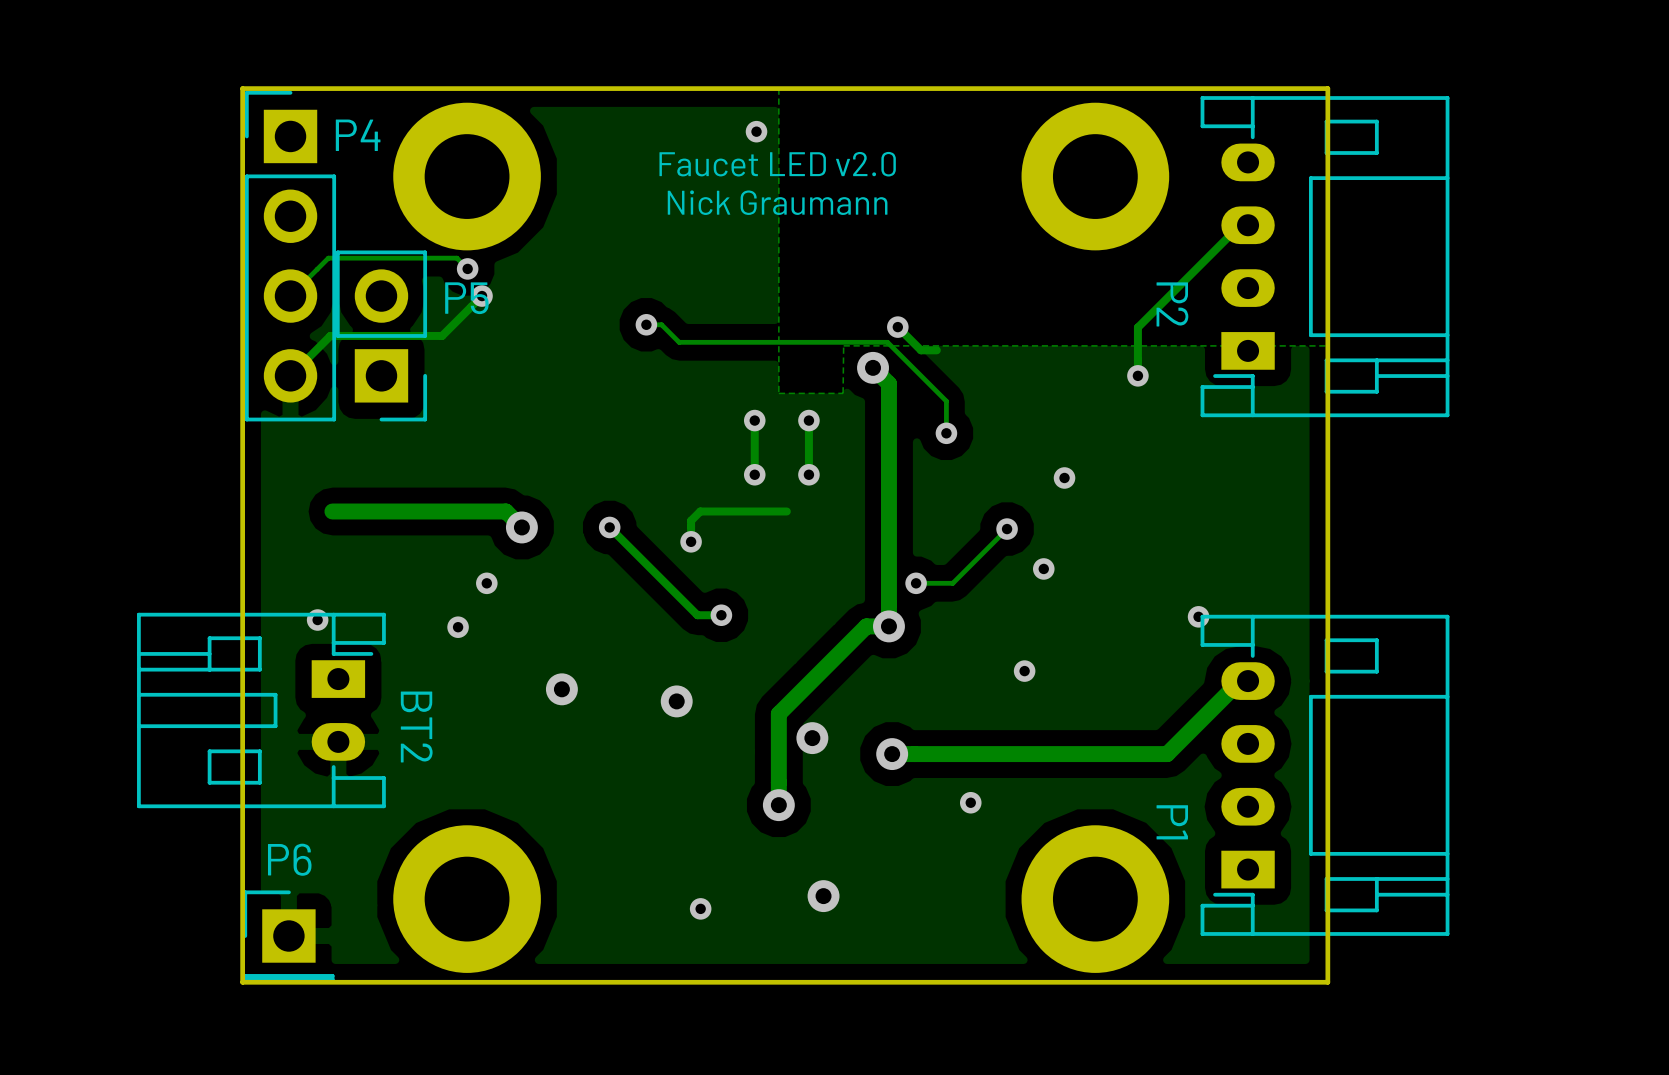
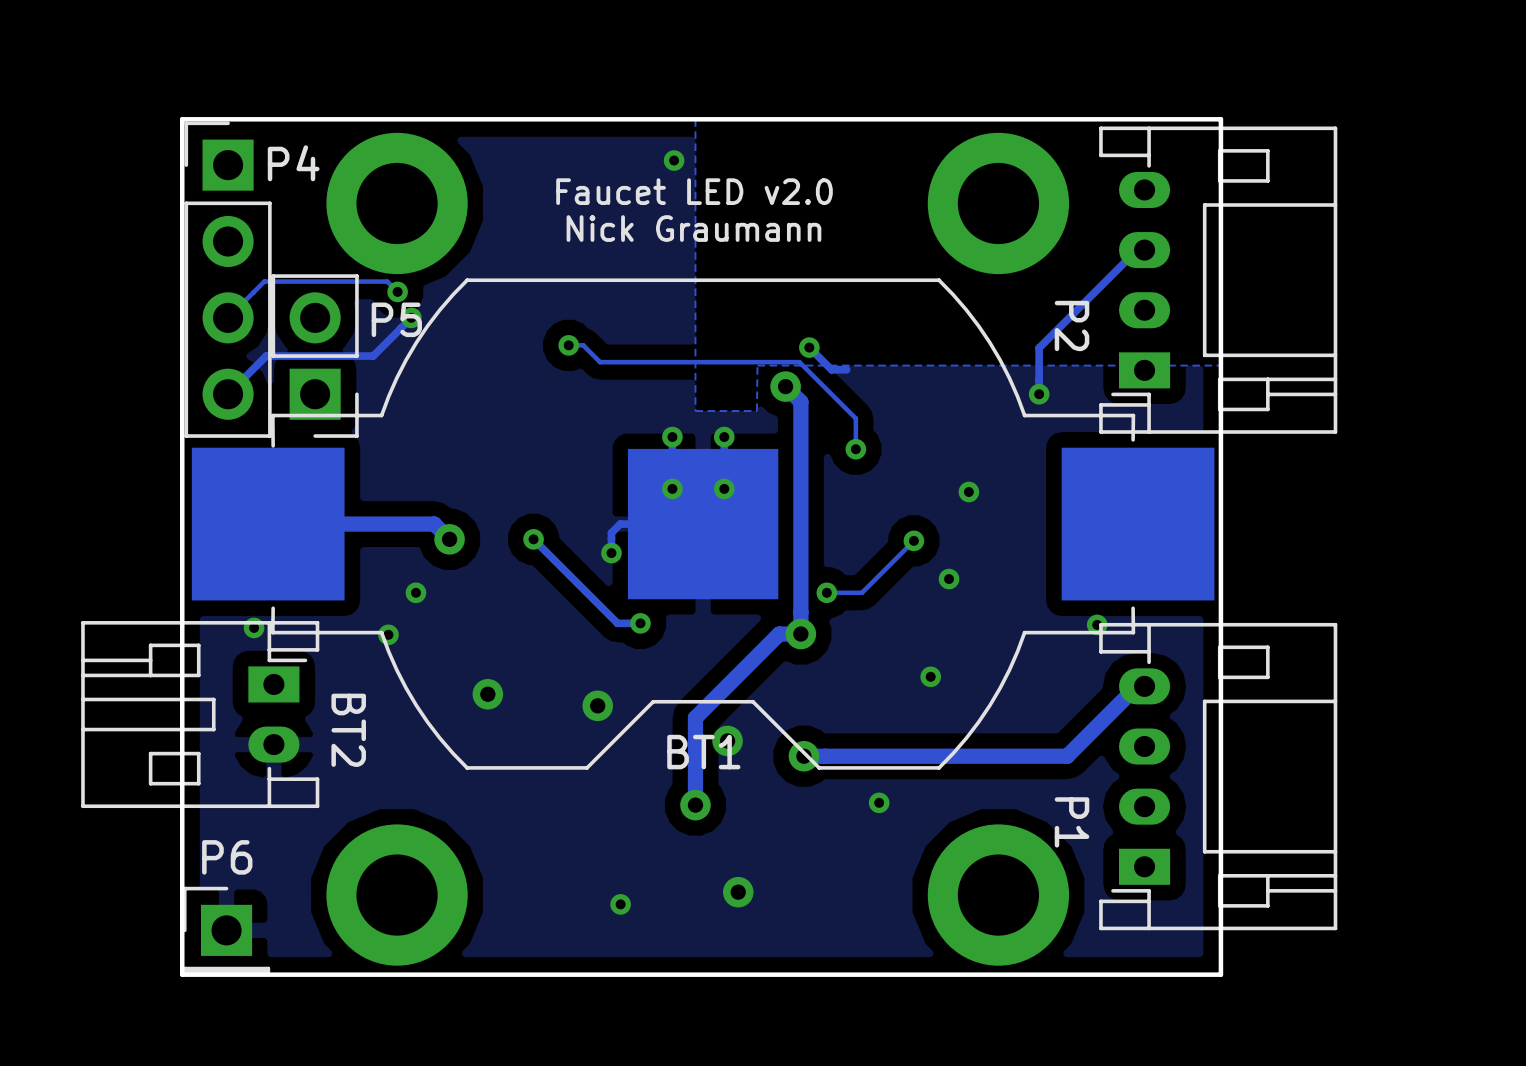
BT1: none -> (703, 524)

